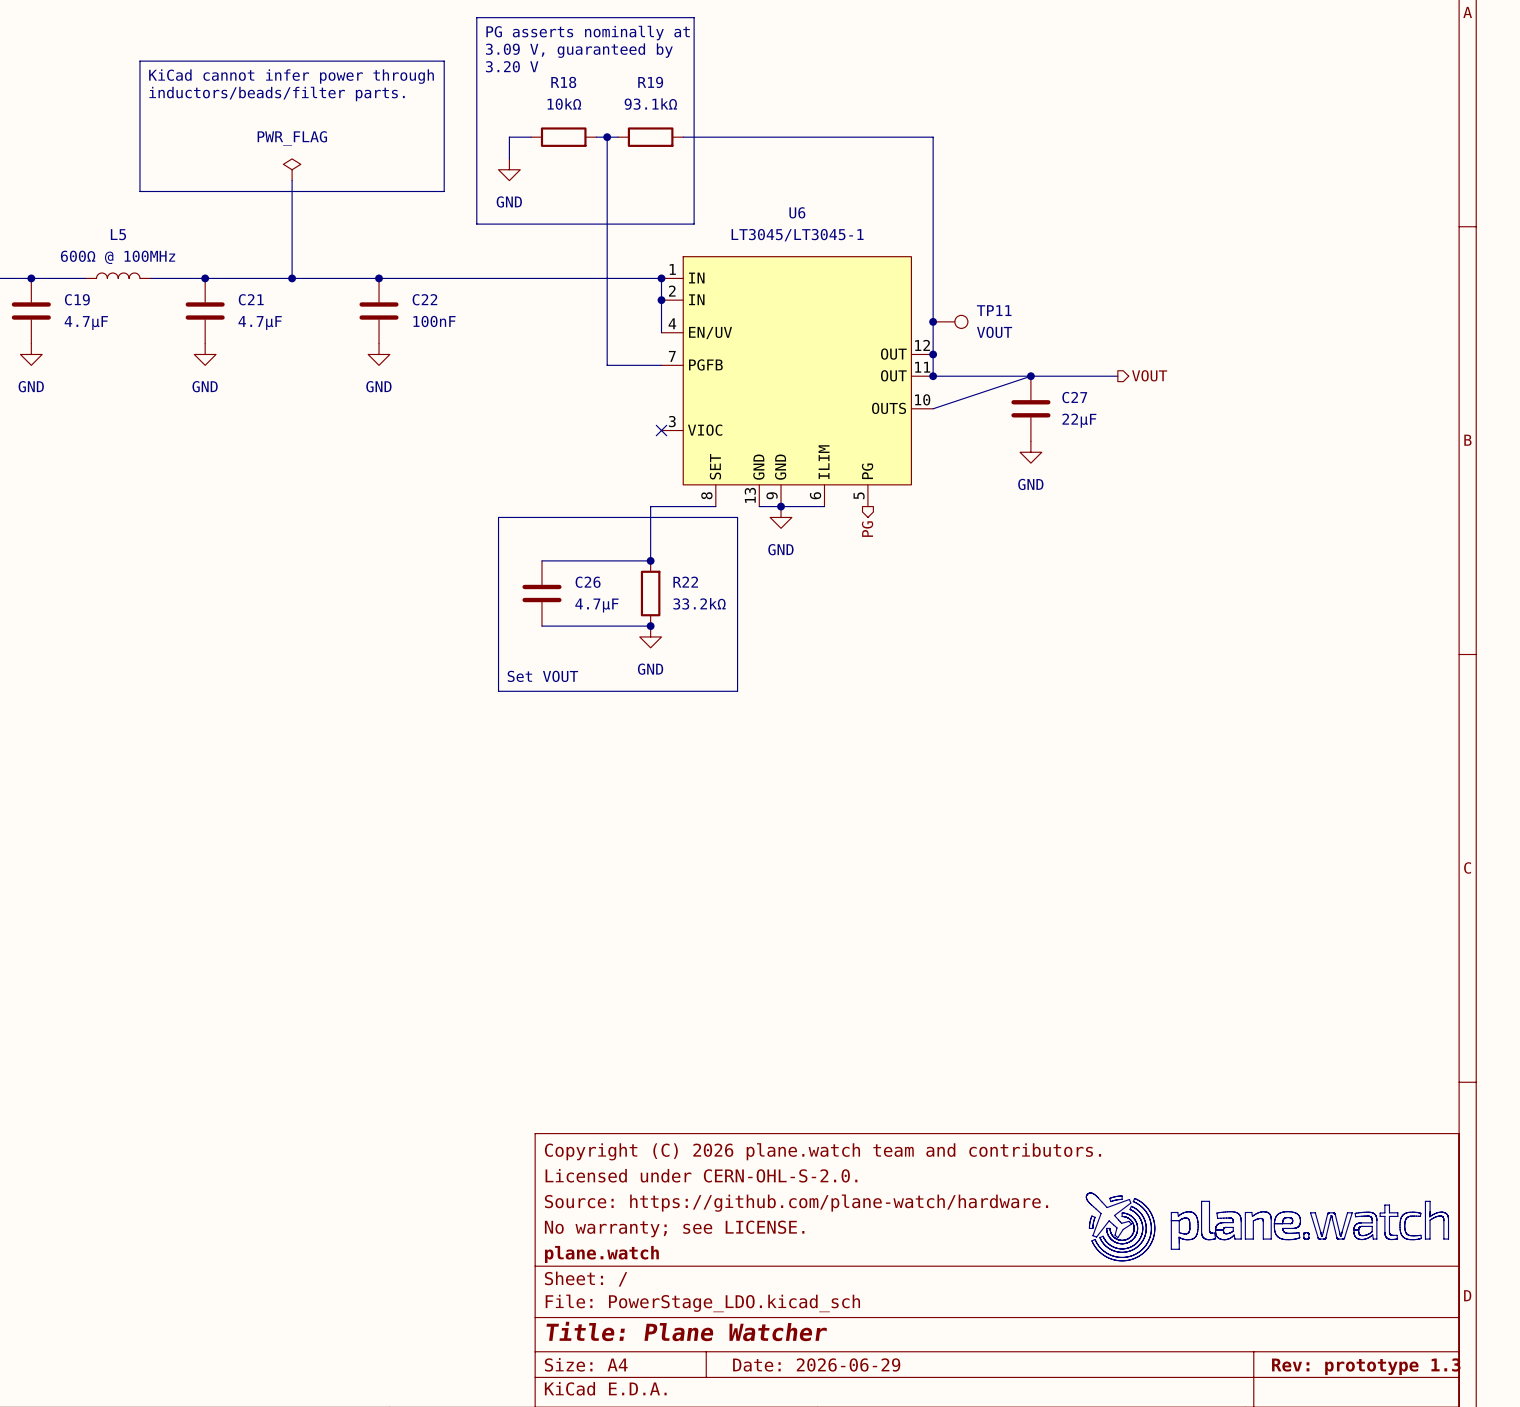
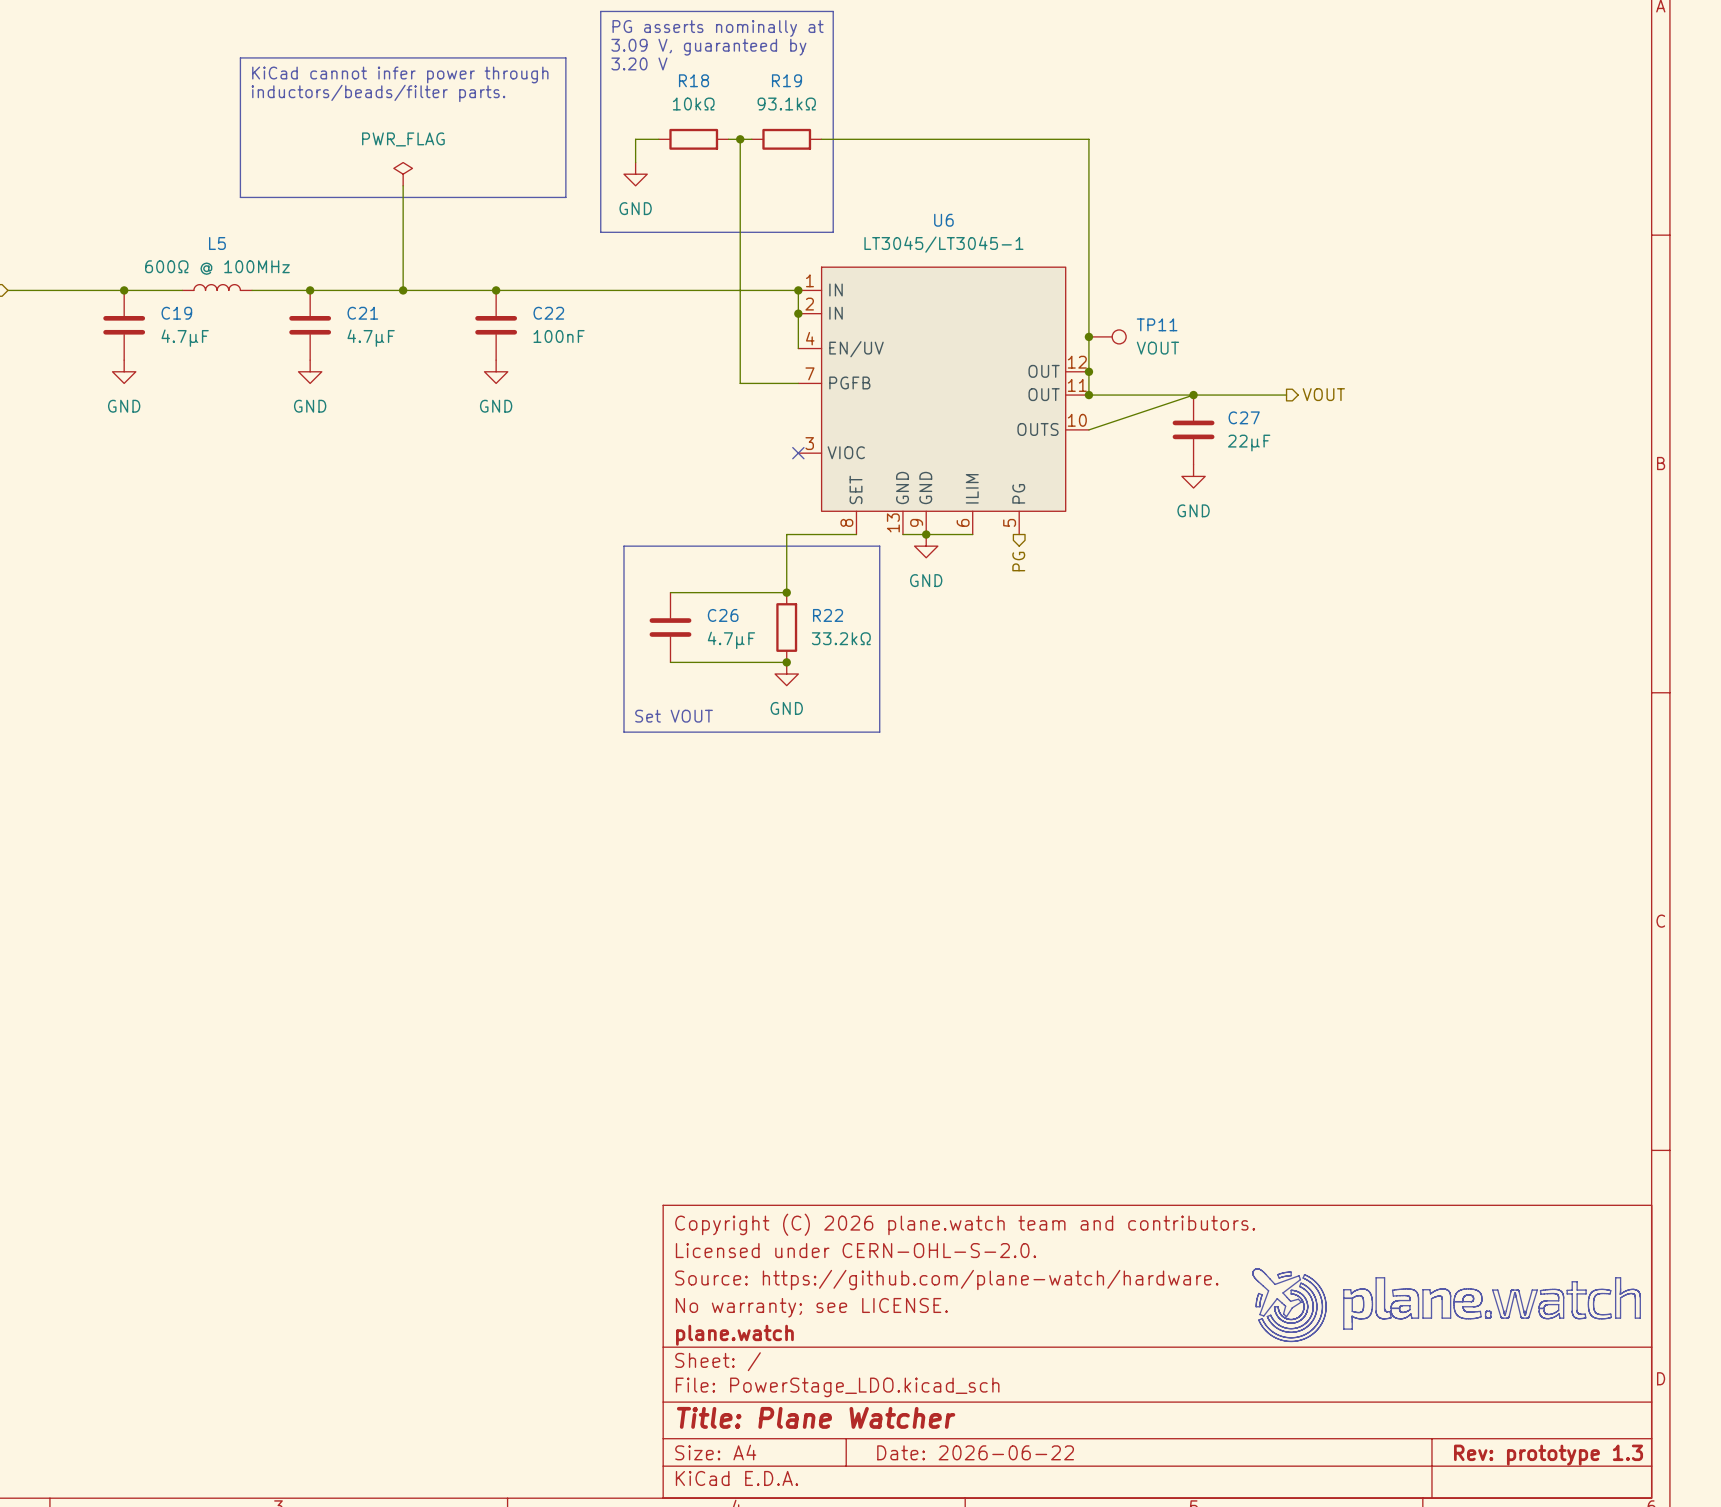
title block: Date: 2026-06-29 (816, 1364) -> Date: 2026-06-22 (975, 1452)

